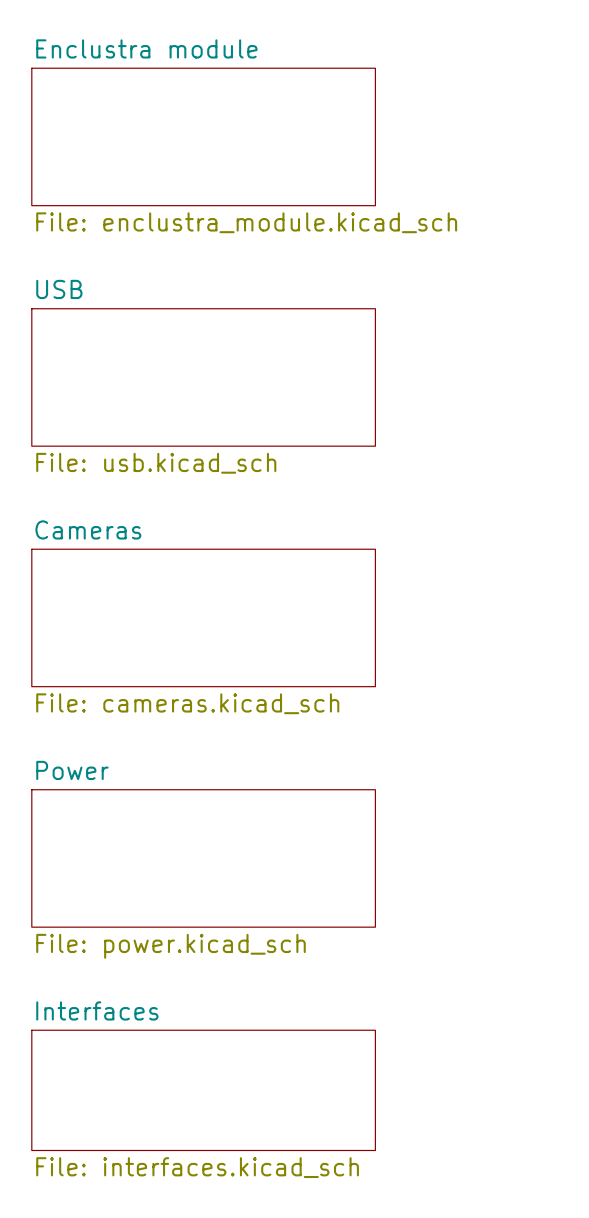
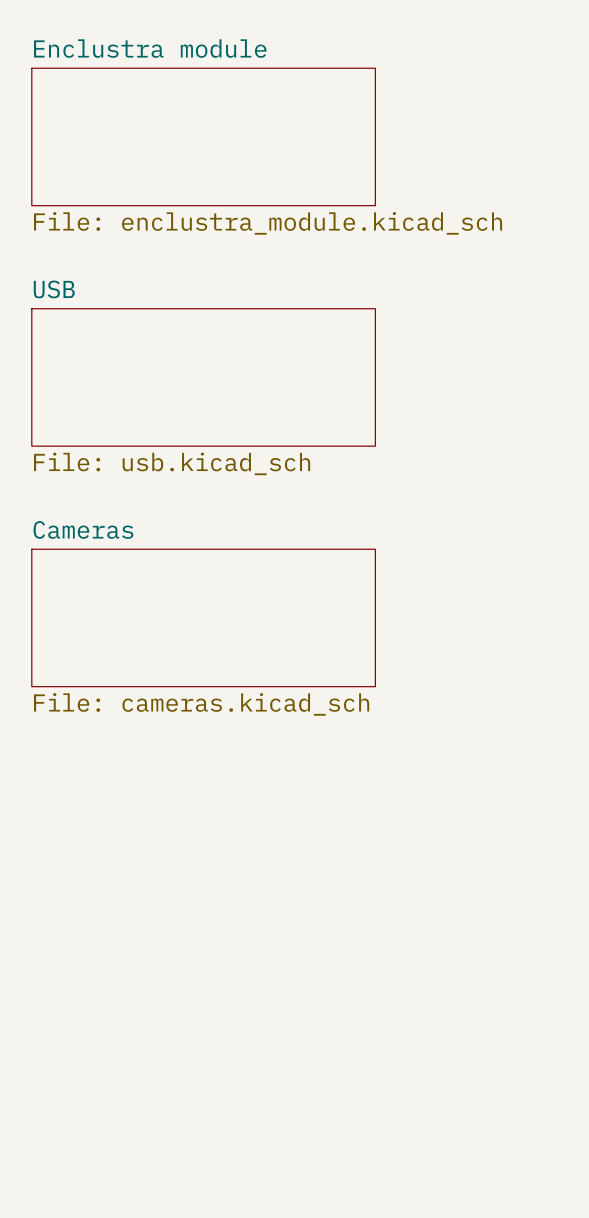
sheet Power: File: power.kicad_sch (203, 858) -> none
sheet Interfaces: File: interfaces.kicad_sch (203, 1090) -> none

